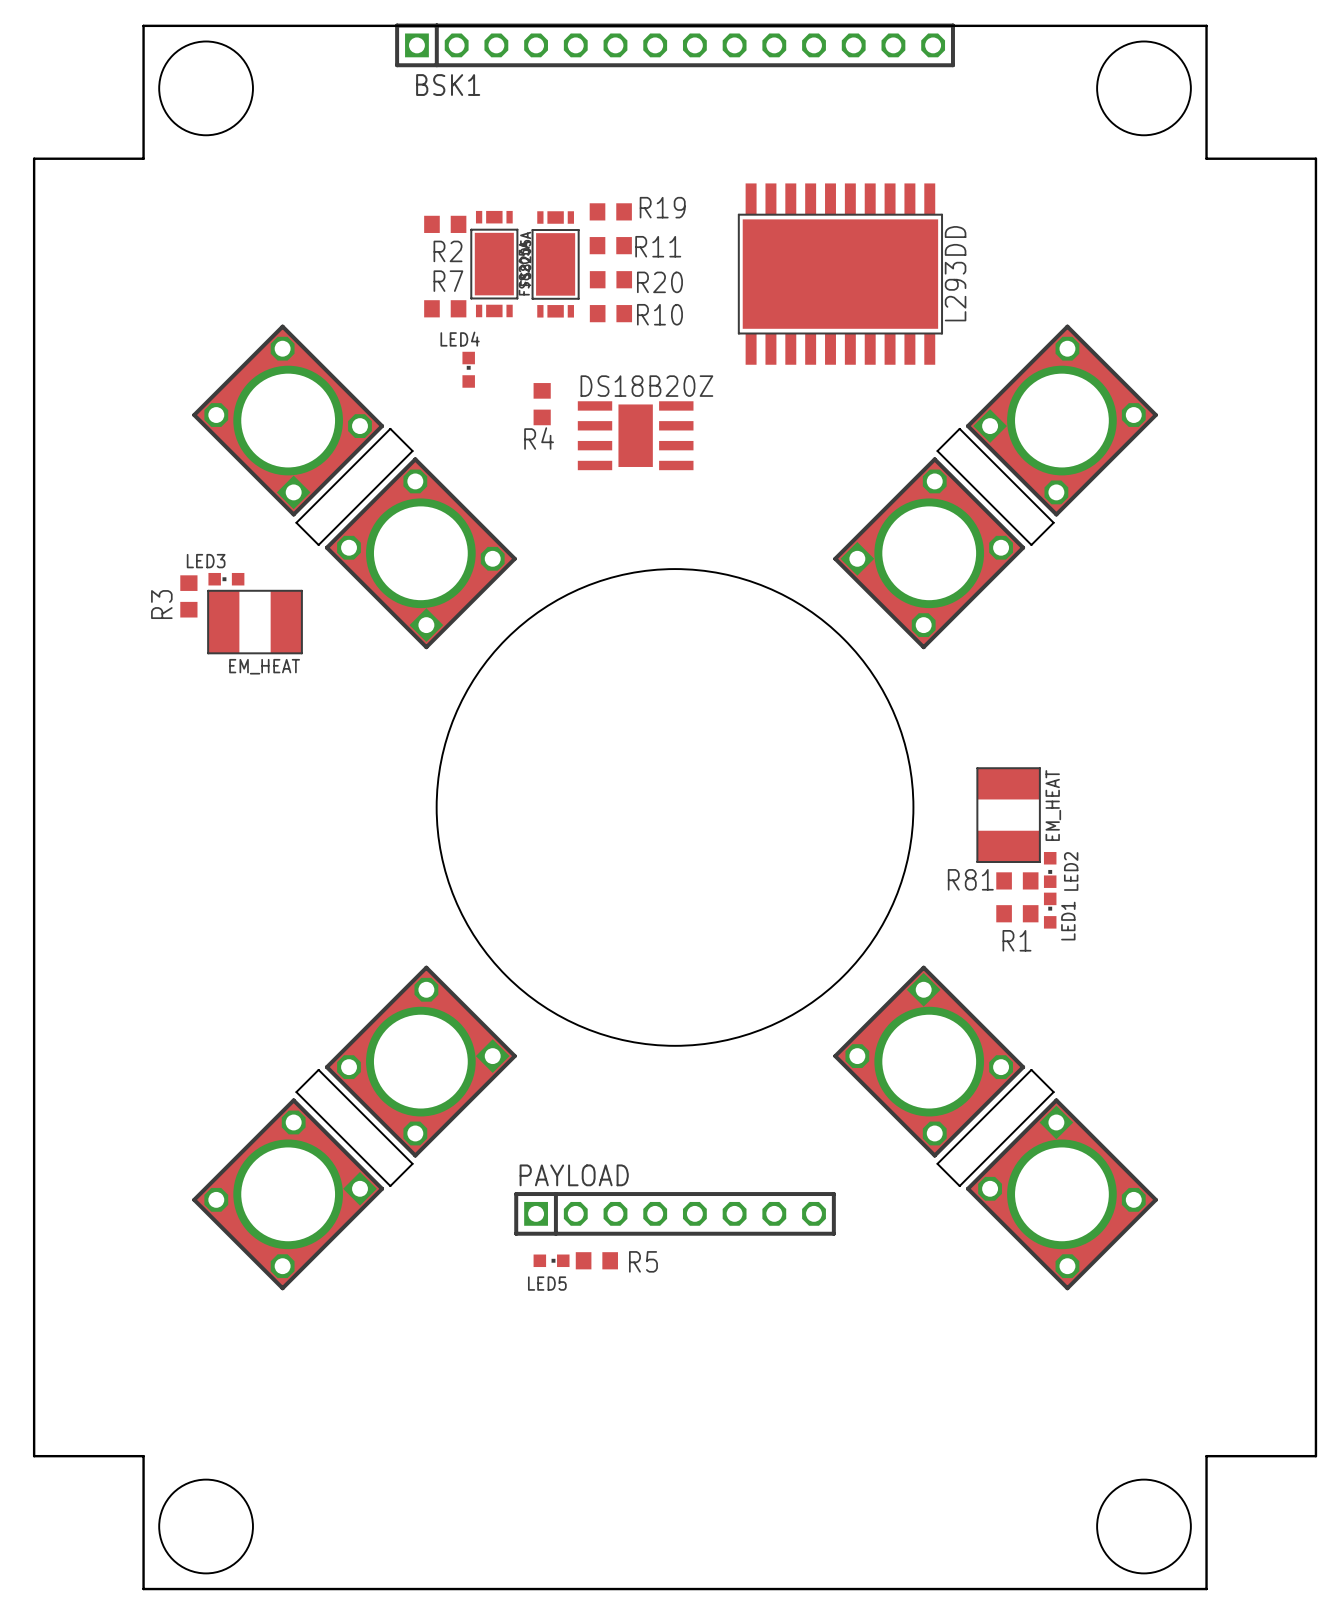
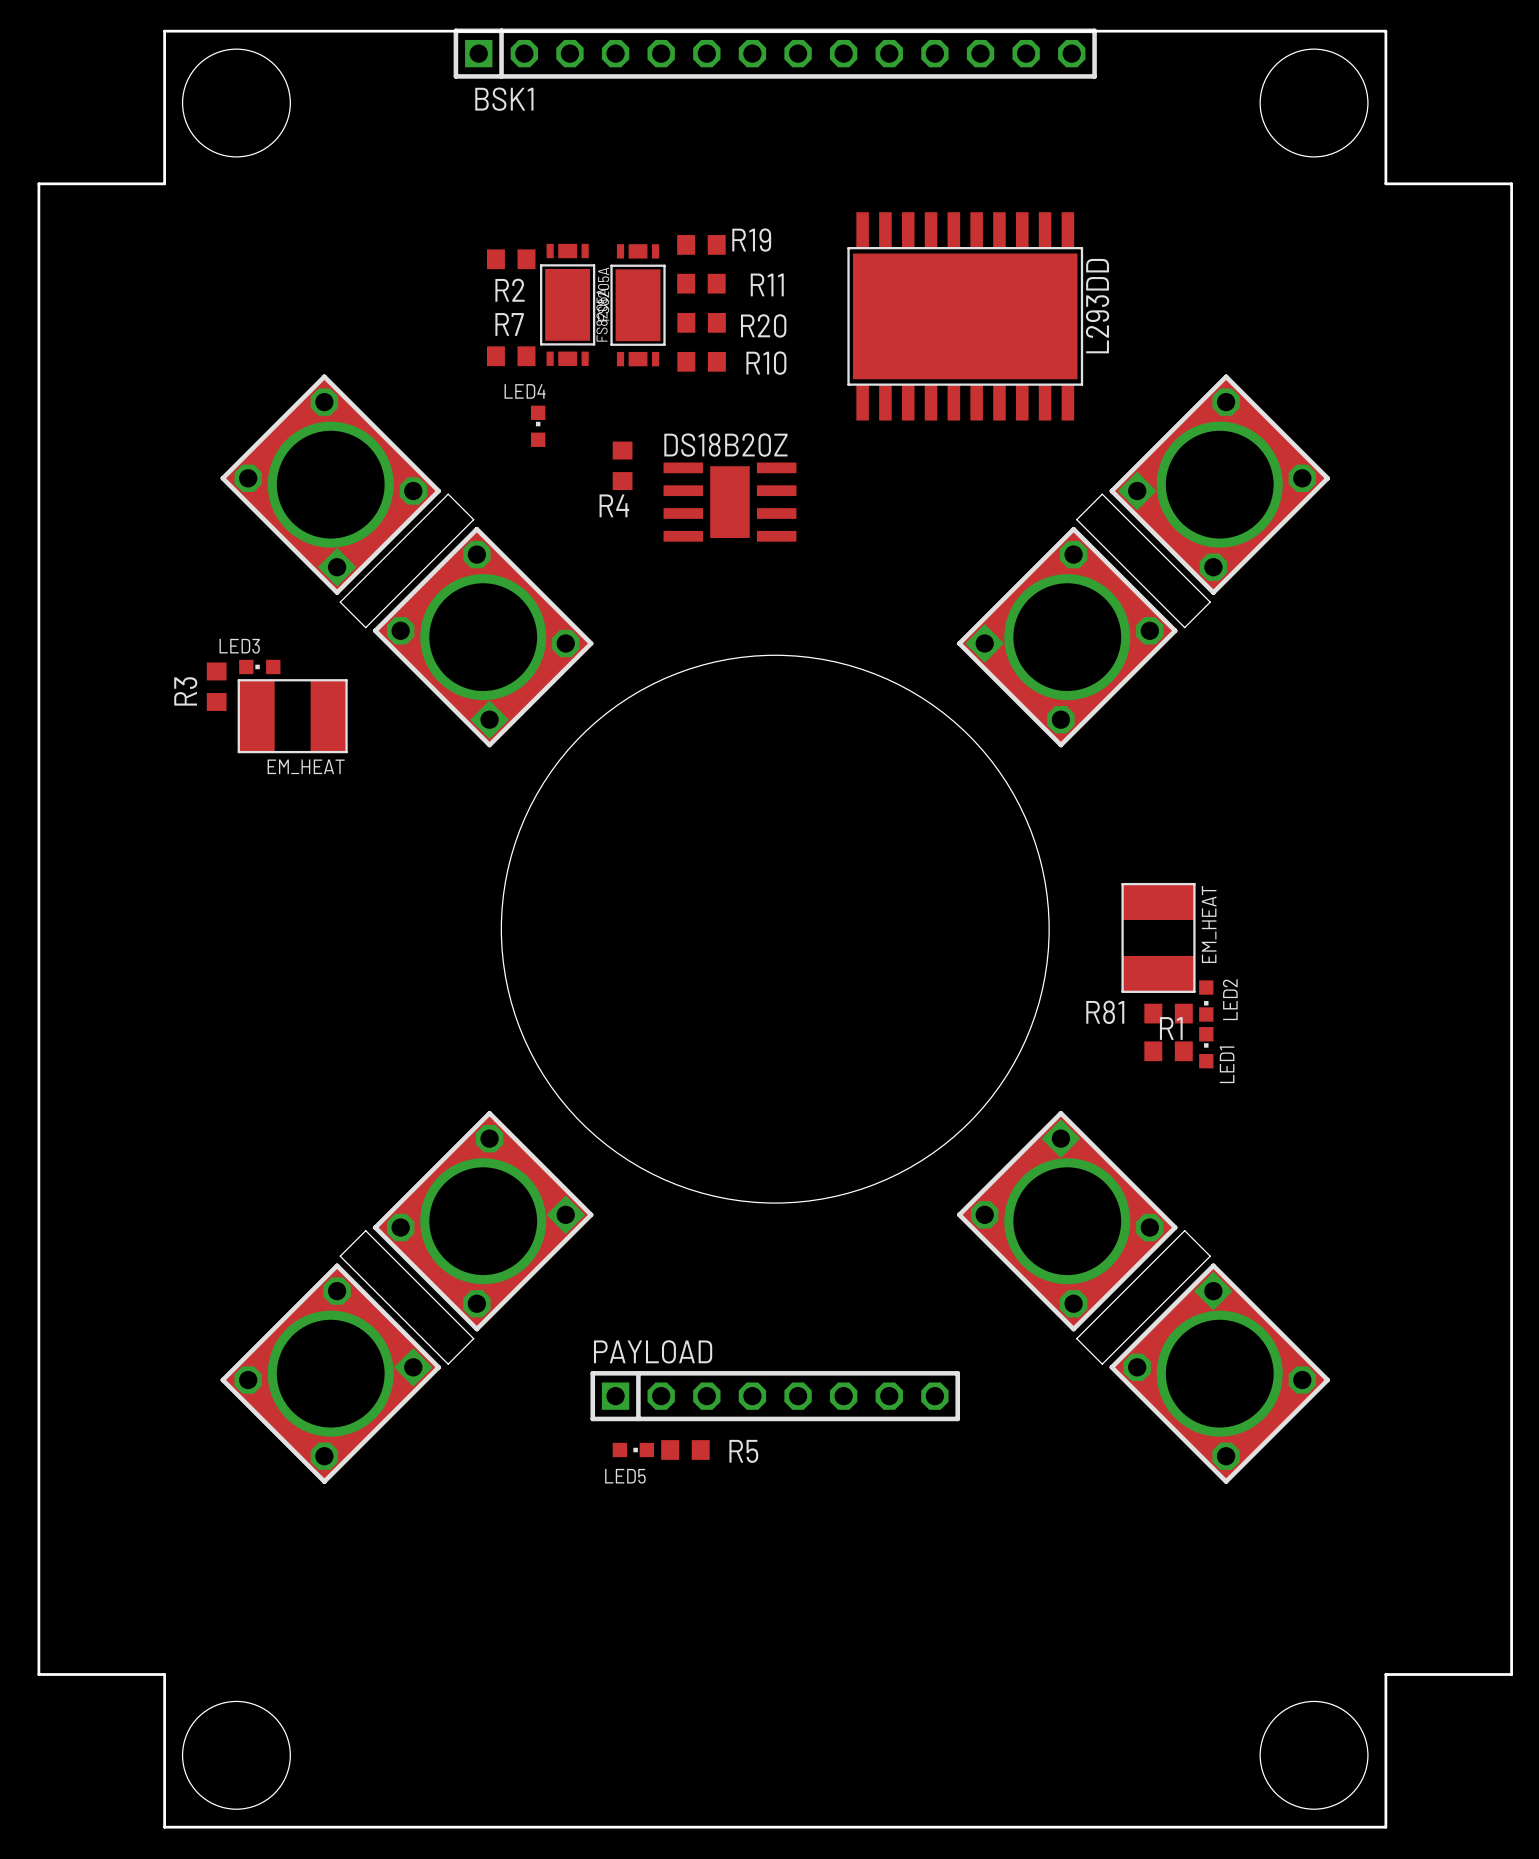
R1 name position: R1 (1016, 940) -> R1 (1171, 1028)

